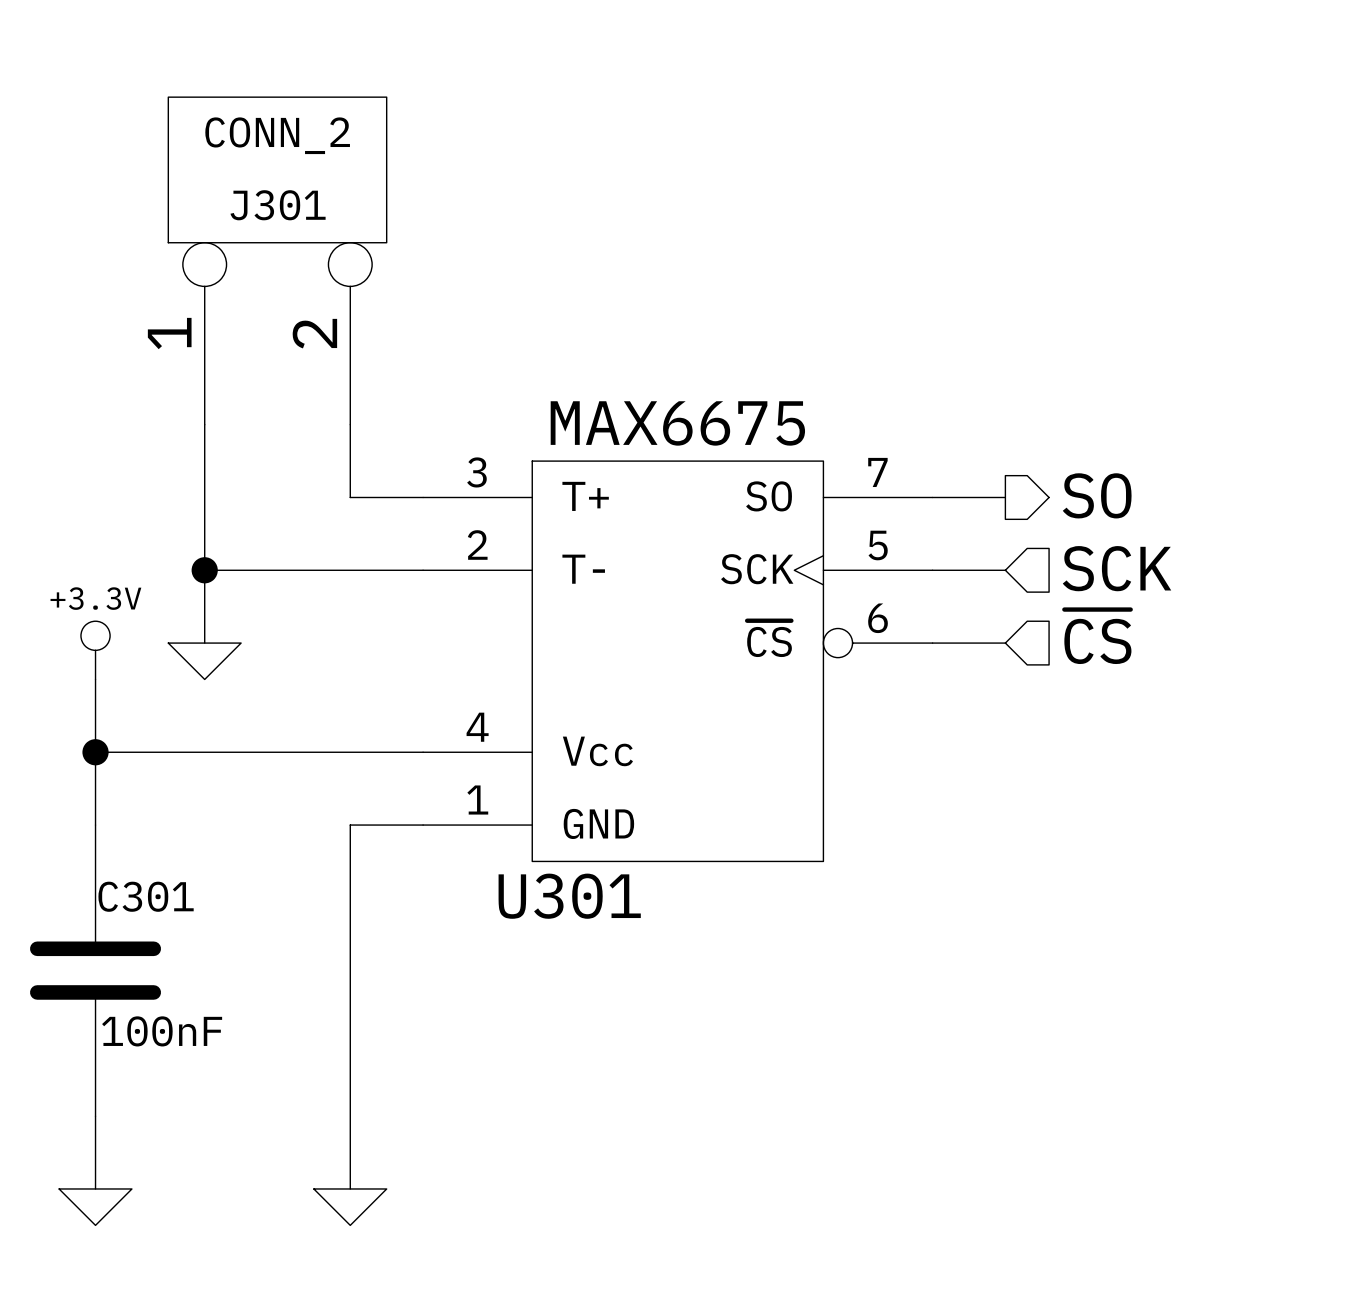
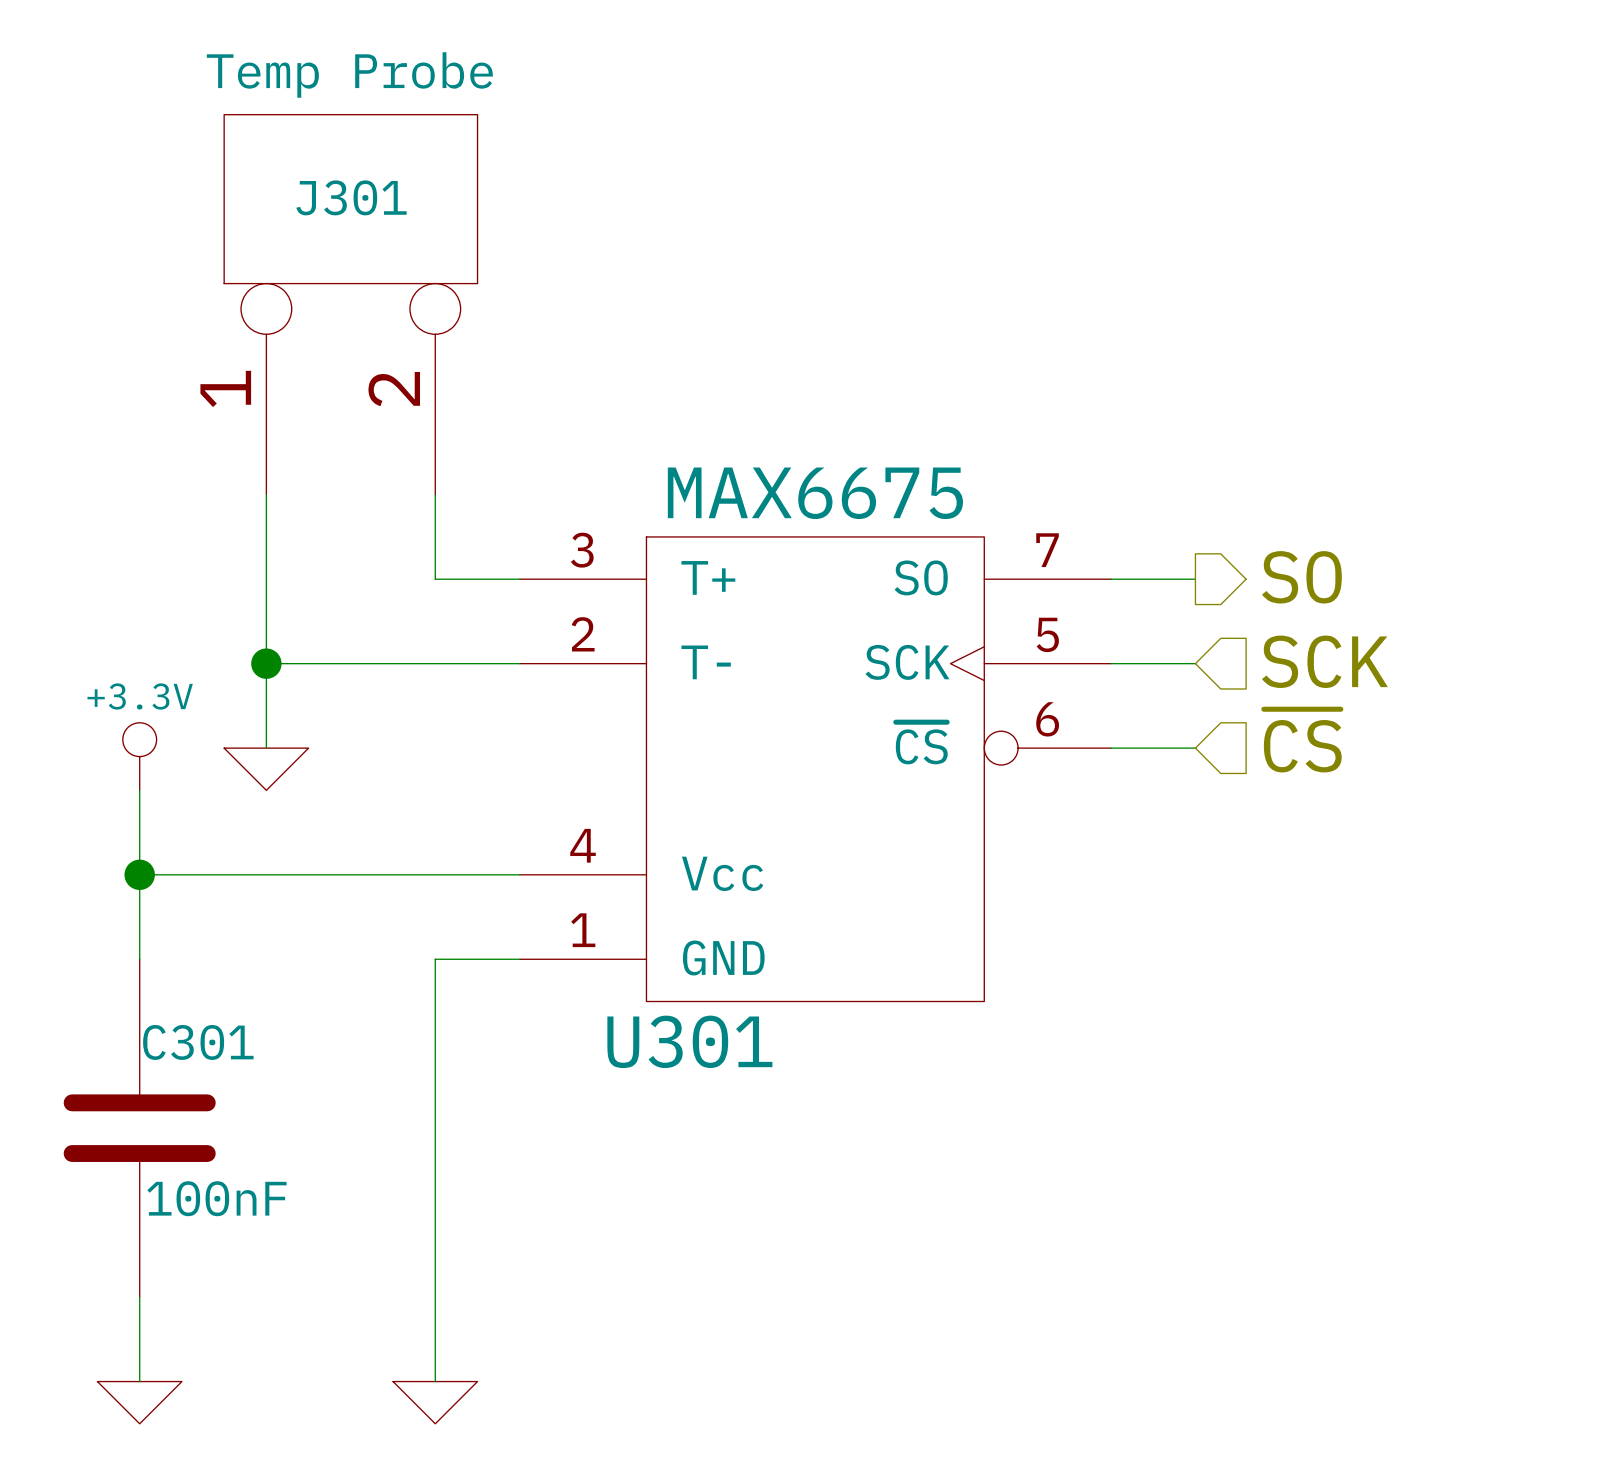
J301 value: CONN_2 (277, 135) -> Temp Probe (349, 75)
J301 name position: J301 (278, 205) -> J301 (351, 197)

